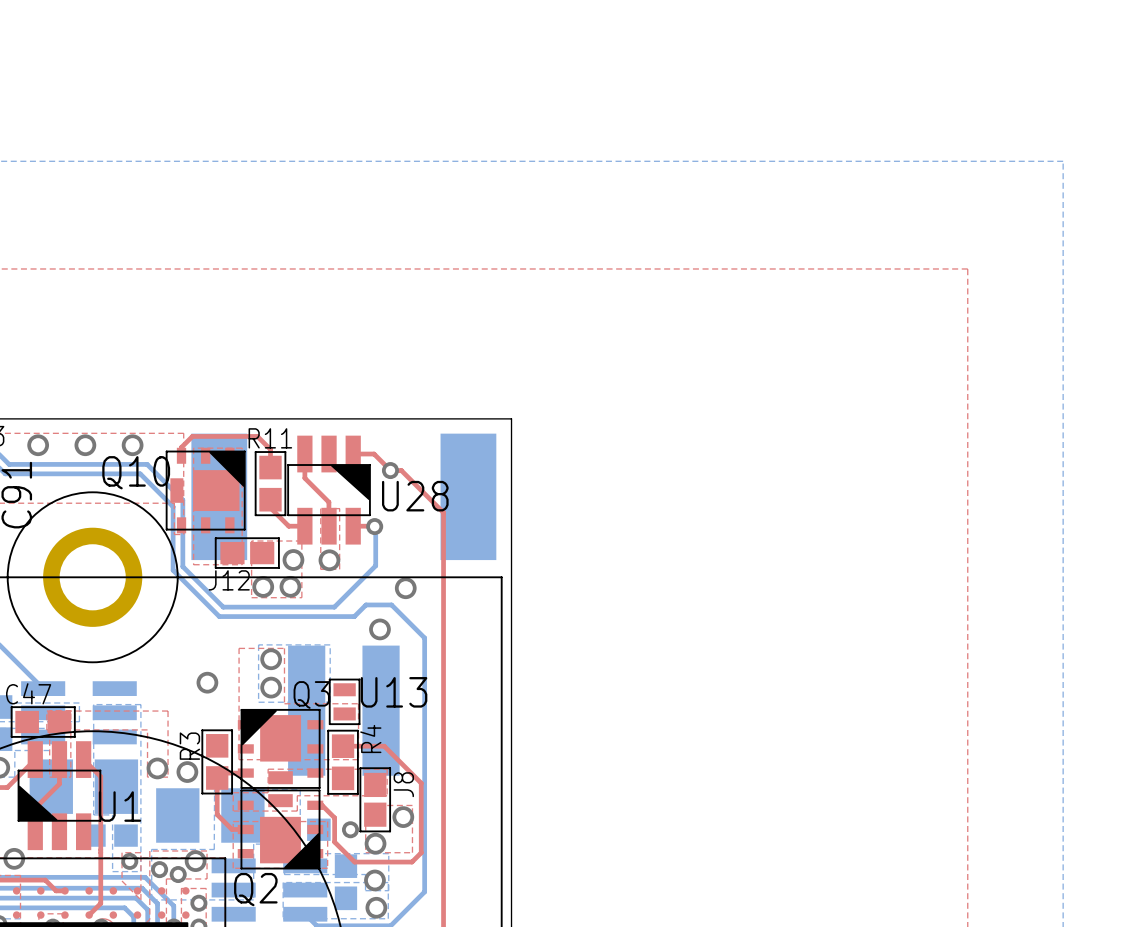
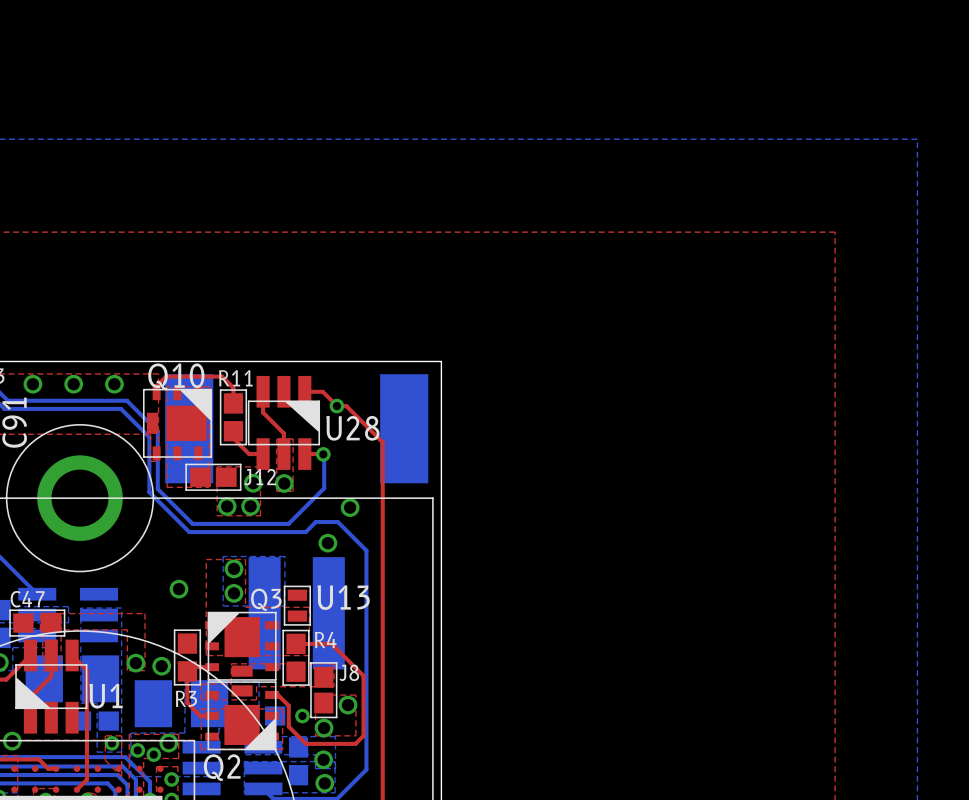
Q10 name position: Q10 (136, 472) -> Q10 (176, 376)
J12 name position: J12 (229, 580) -> J12 (260, 477)
R4 name rotation: 0° (370, 738) -> 90° clockwise (325, 639)
R3 name rotation: 0° (189, 746) -> 90° clockwise (186, 698)
R3 name position: R3 (189, 746) -> R3 (186, 698)
J8 name rotation: 0° (403, 784) -> 90° clockwise (349, 672)

